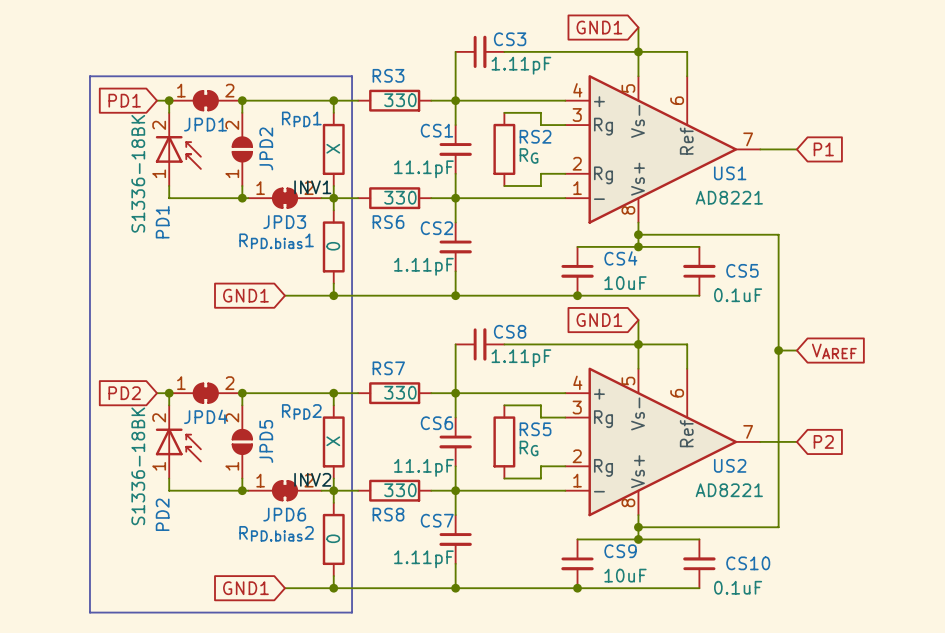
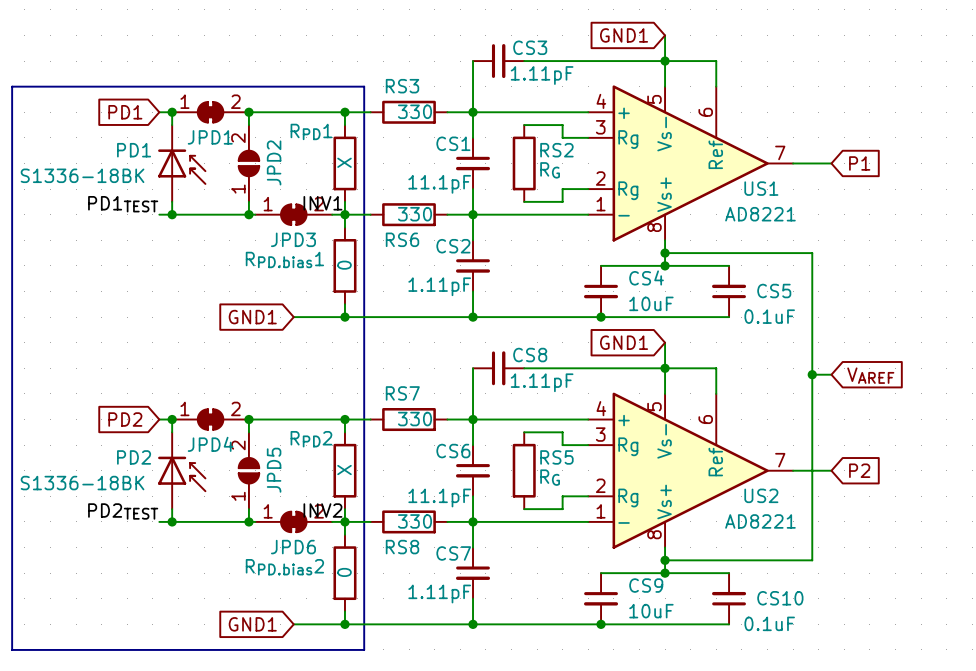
line: (89, 76) (89, 612) -> (88, 86) (12, 86) (12, 649) (88, 649)
PD1 pin number: 2 (159, 125) -> none
PD1 value rotation: 0° (138, 173) -> 90° clockwise (82, 175)
PD1 pin number: 1 (159, 173) -> none
label: none -> PD1TEST (123, 204)
wire: none -> (159, 214) (172, 214)
junction: none -> (172, 214)
PD1 name rotation: 0° (162, 222) -> 90° clockwise (134, 150)
PD1 name position: PD1 (162, 222) -> PD1 (134, 150)
PD2 pin number: 2 (159, 417) -> none
PD2 value rotation: 0° (138, 466) -> 90° clockwise (82, 483)
PD2 pin number: 1 (159, 466) -> none
label: none -> PD2TEST (123, 511)
wire: none -> (159, 521) (172, 521)
junction: none -> (172, 521)
PD2 name rotation: 0° (162, 514) -> 90° clockwise (134, 457)
PD2 name position: PD2 (162, 514) -> PD2 (134, 457)

